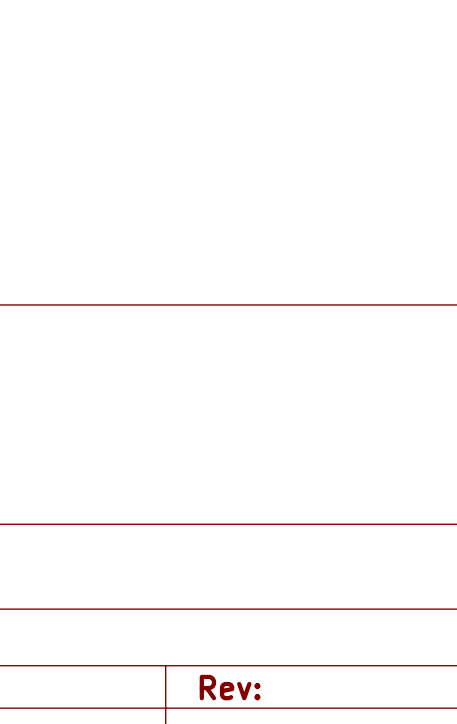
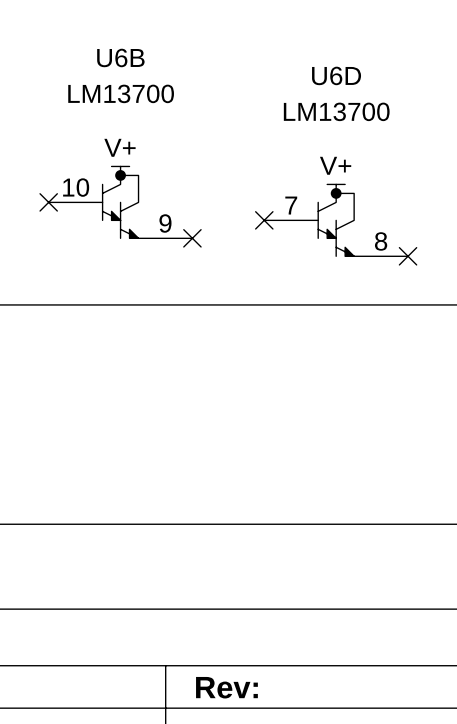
no-connect mark: none -> (48, 202)
U6B: none -> LM13700 (120, 202)
no-connect mark: none -> (264, 220)
U6D: none -> LM13700 (336, 220)
no-connect mark: none -> (192, 238)
no-connect mark: none -> (408, 256)

